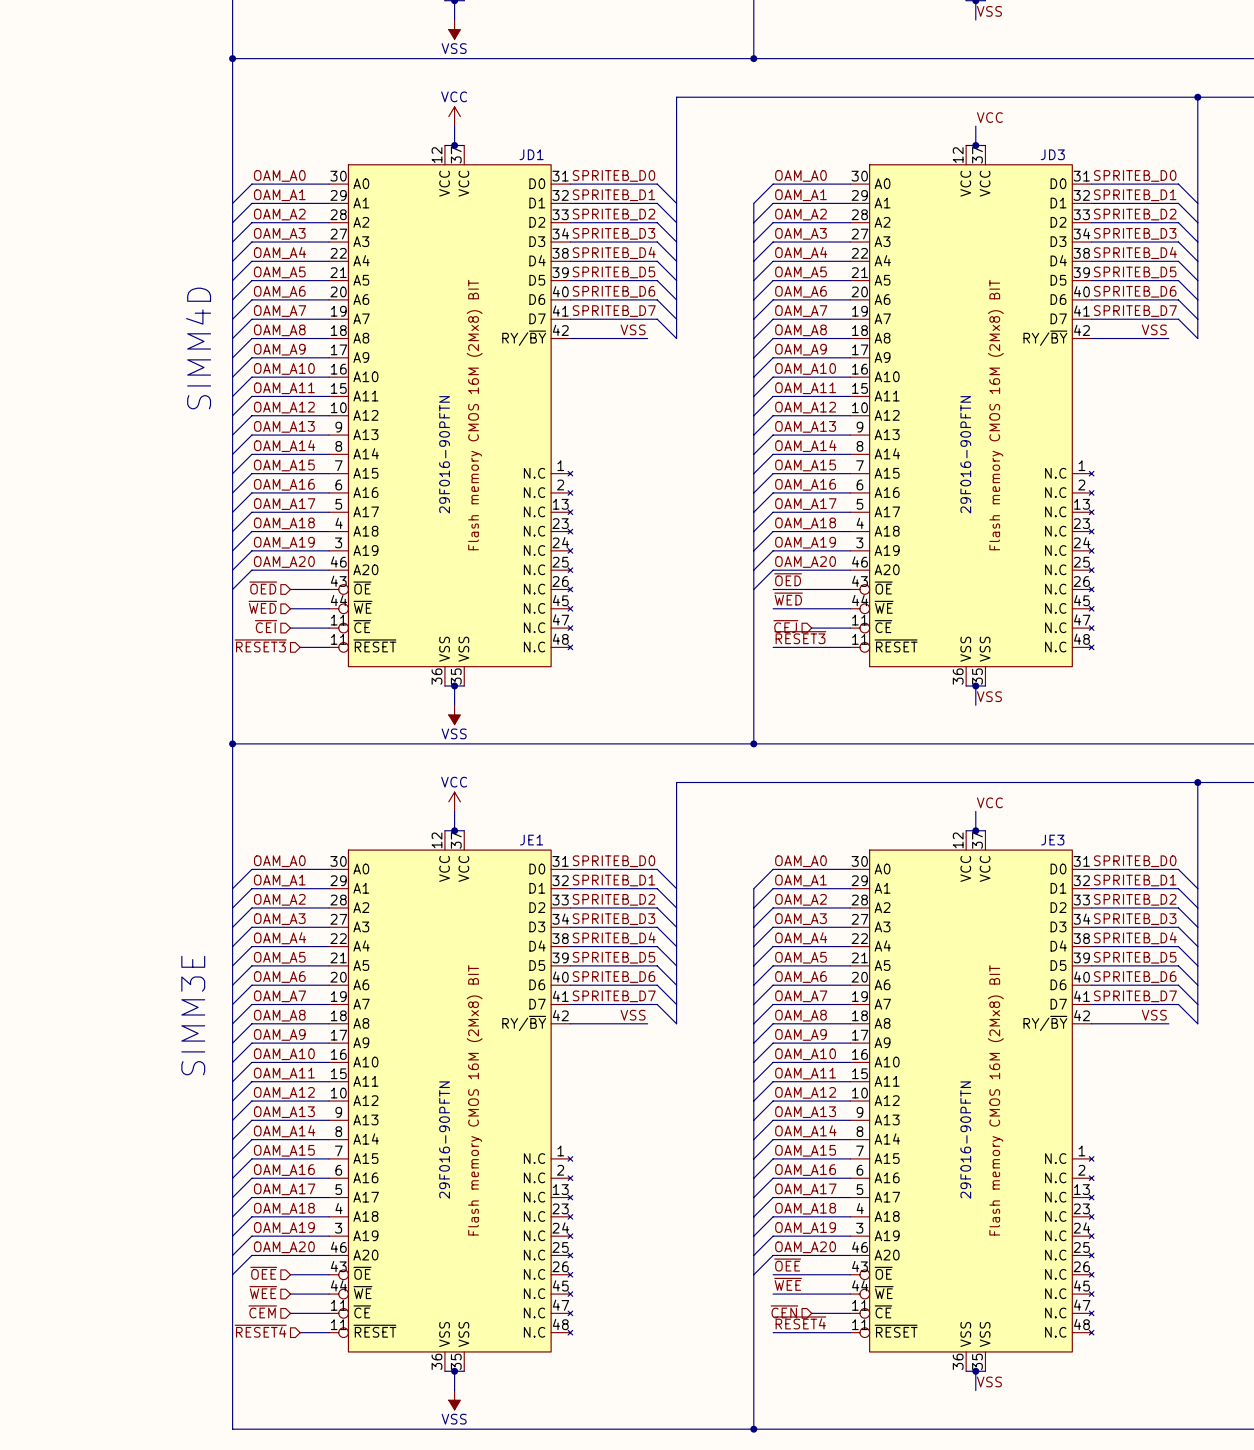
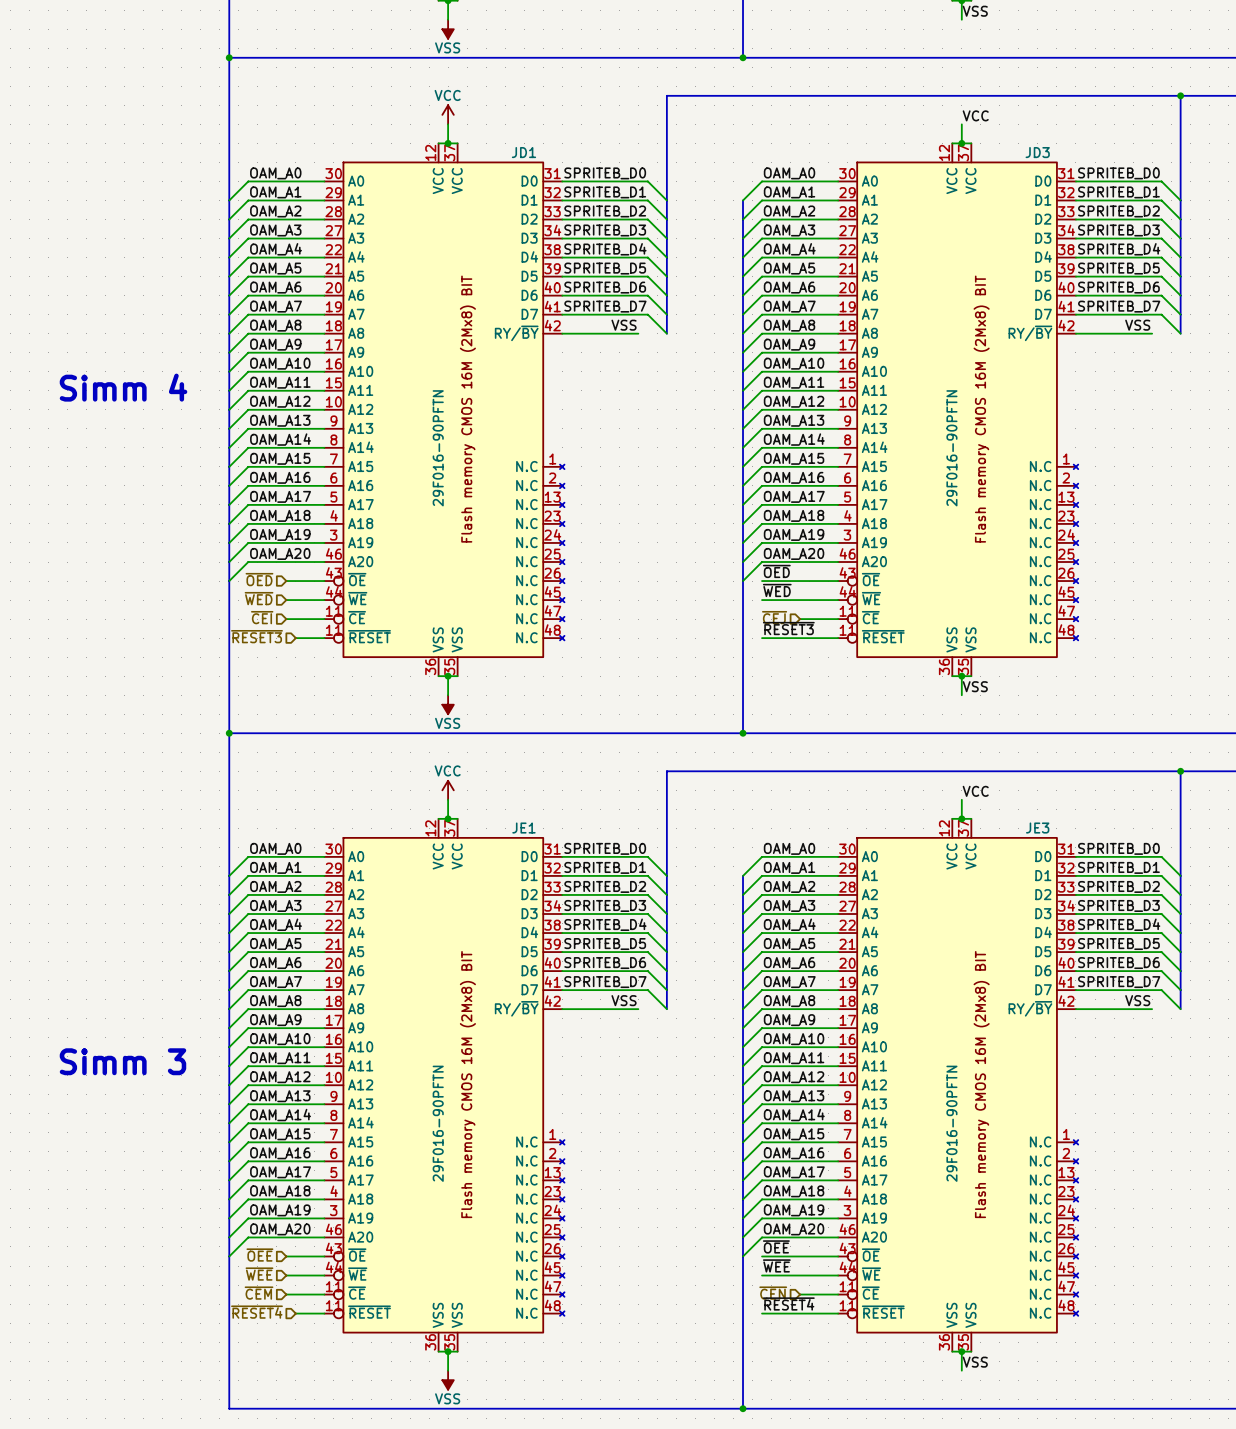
text: SIMM4D (198, 348) -> none
text: none -> Simm 4 (123, 387)
text: SIMM3E (193, 1015) -> none
text: none -> Simm 3 (122, 1061)

